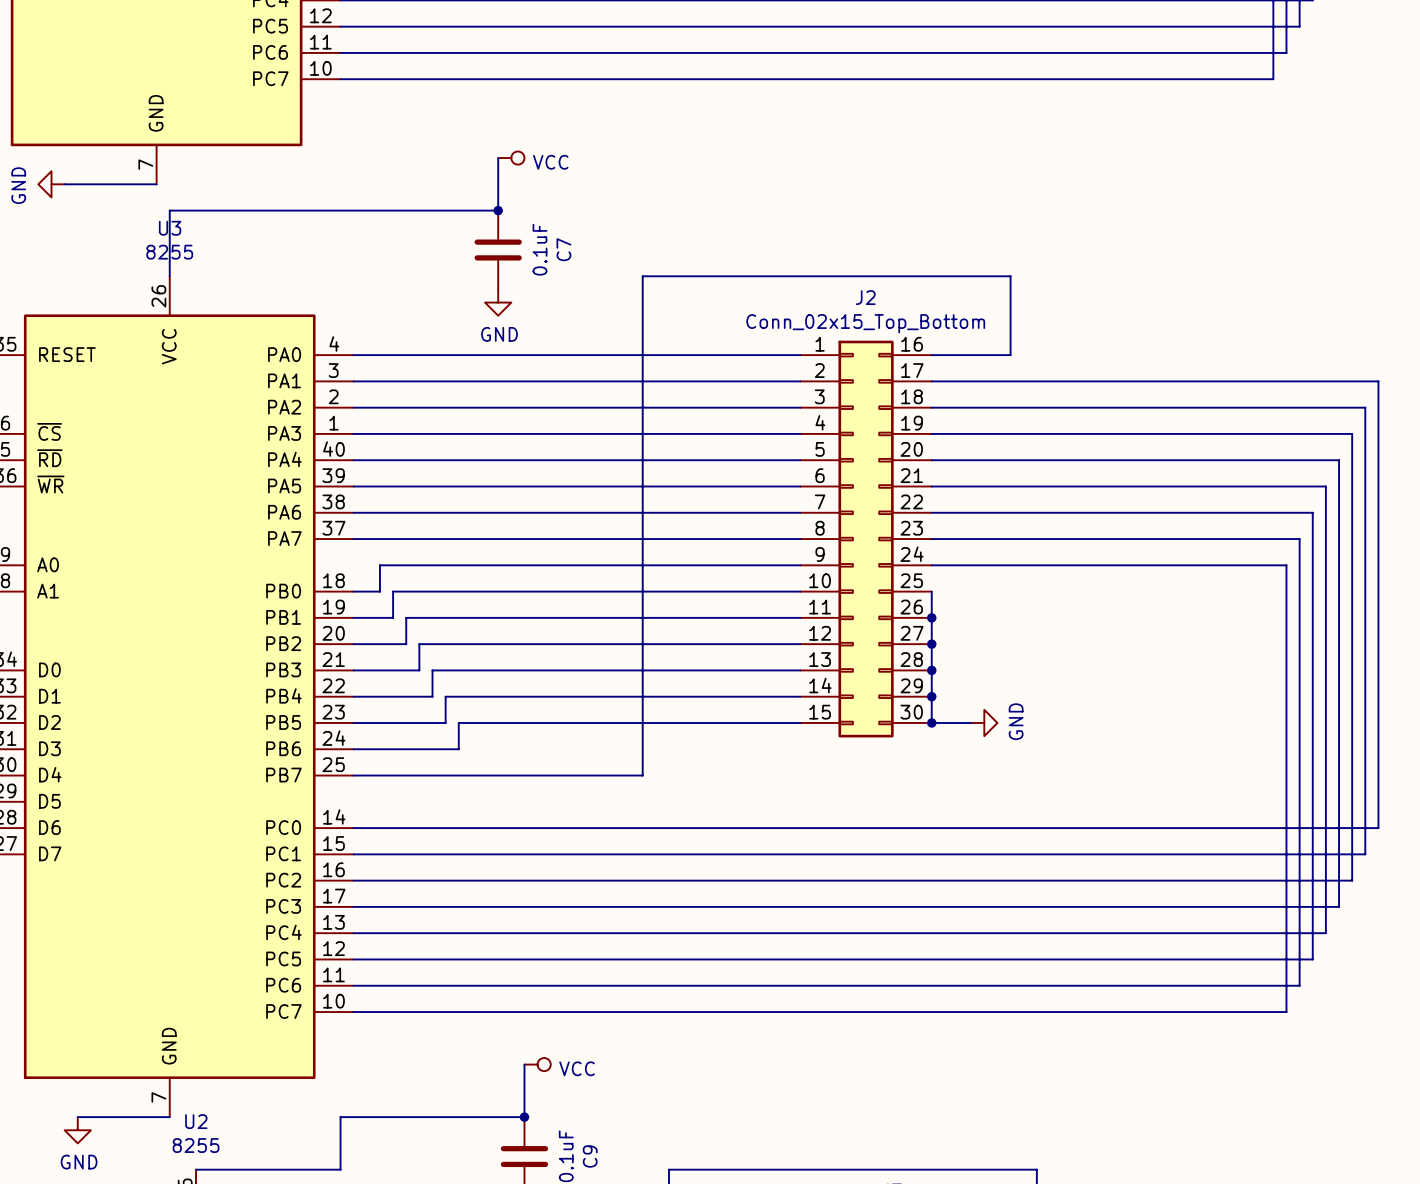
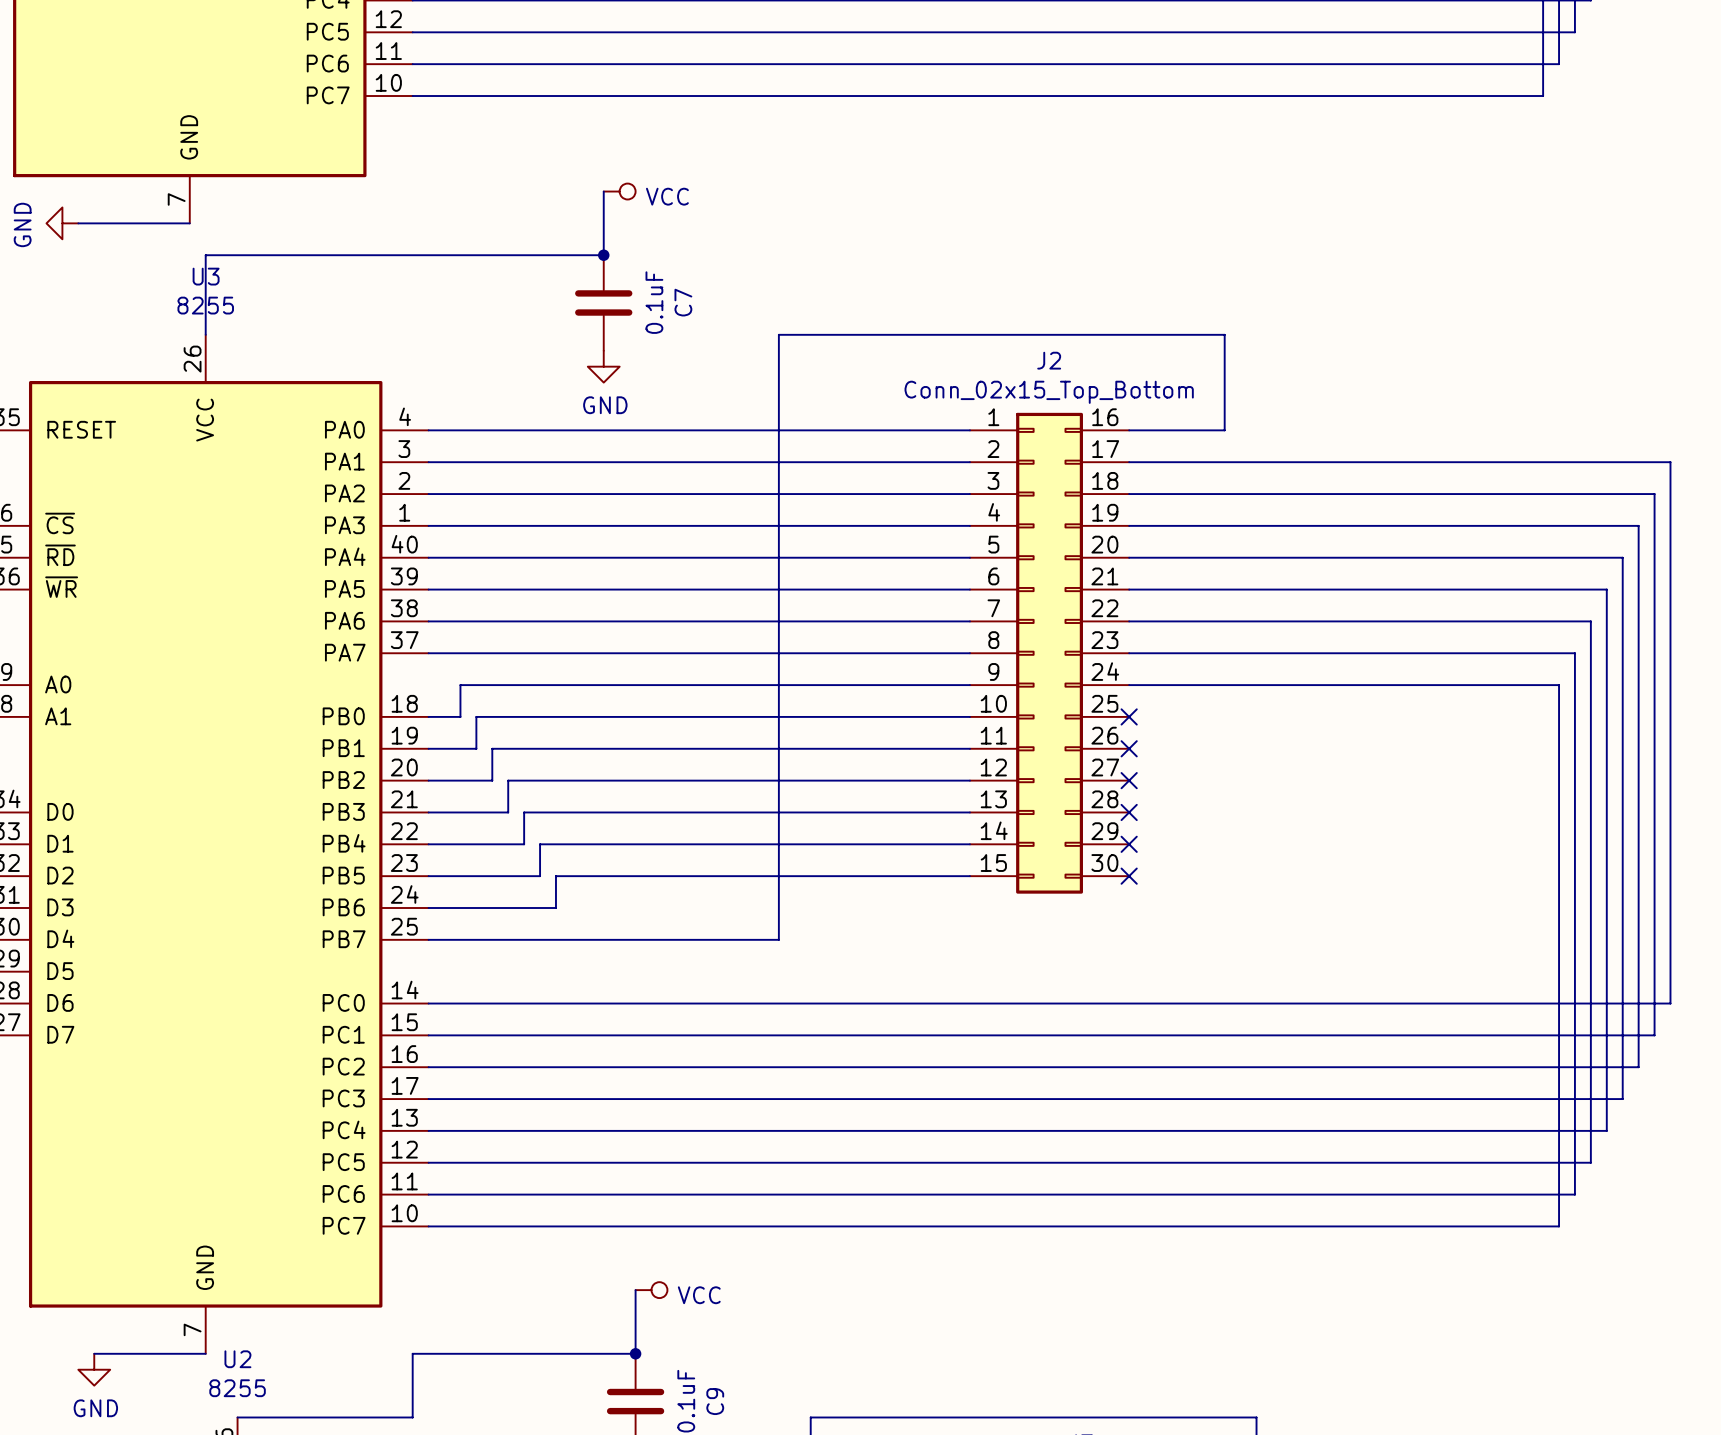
wire: (931, 591) (931, 722) (971, 722) -> none
no-connect mark: none -> (1129, 716)
junction: (931, 617) -> none
no-connect mark: none -> (1129, 748)
junction: (931, 644) -> none
no-connect mark: none -> (1129, 780)
junction: (931, 670) -> none
no-connect mark: none -> (1129, 812)
junction: (931, 696) -> none
no-connect mark: none -> (1129, 844)
junction: (931, 722) -> none
no-connect mark: none -> (1129, 876)
power symbol: GND (984, 722) -> none

